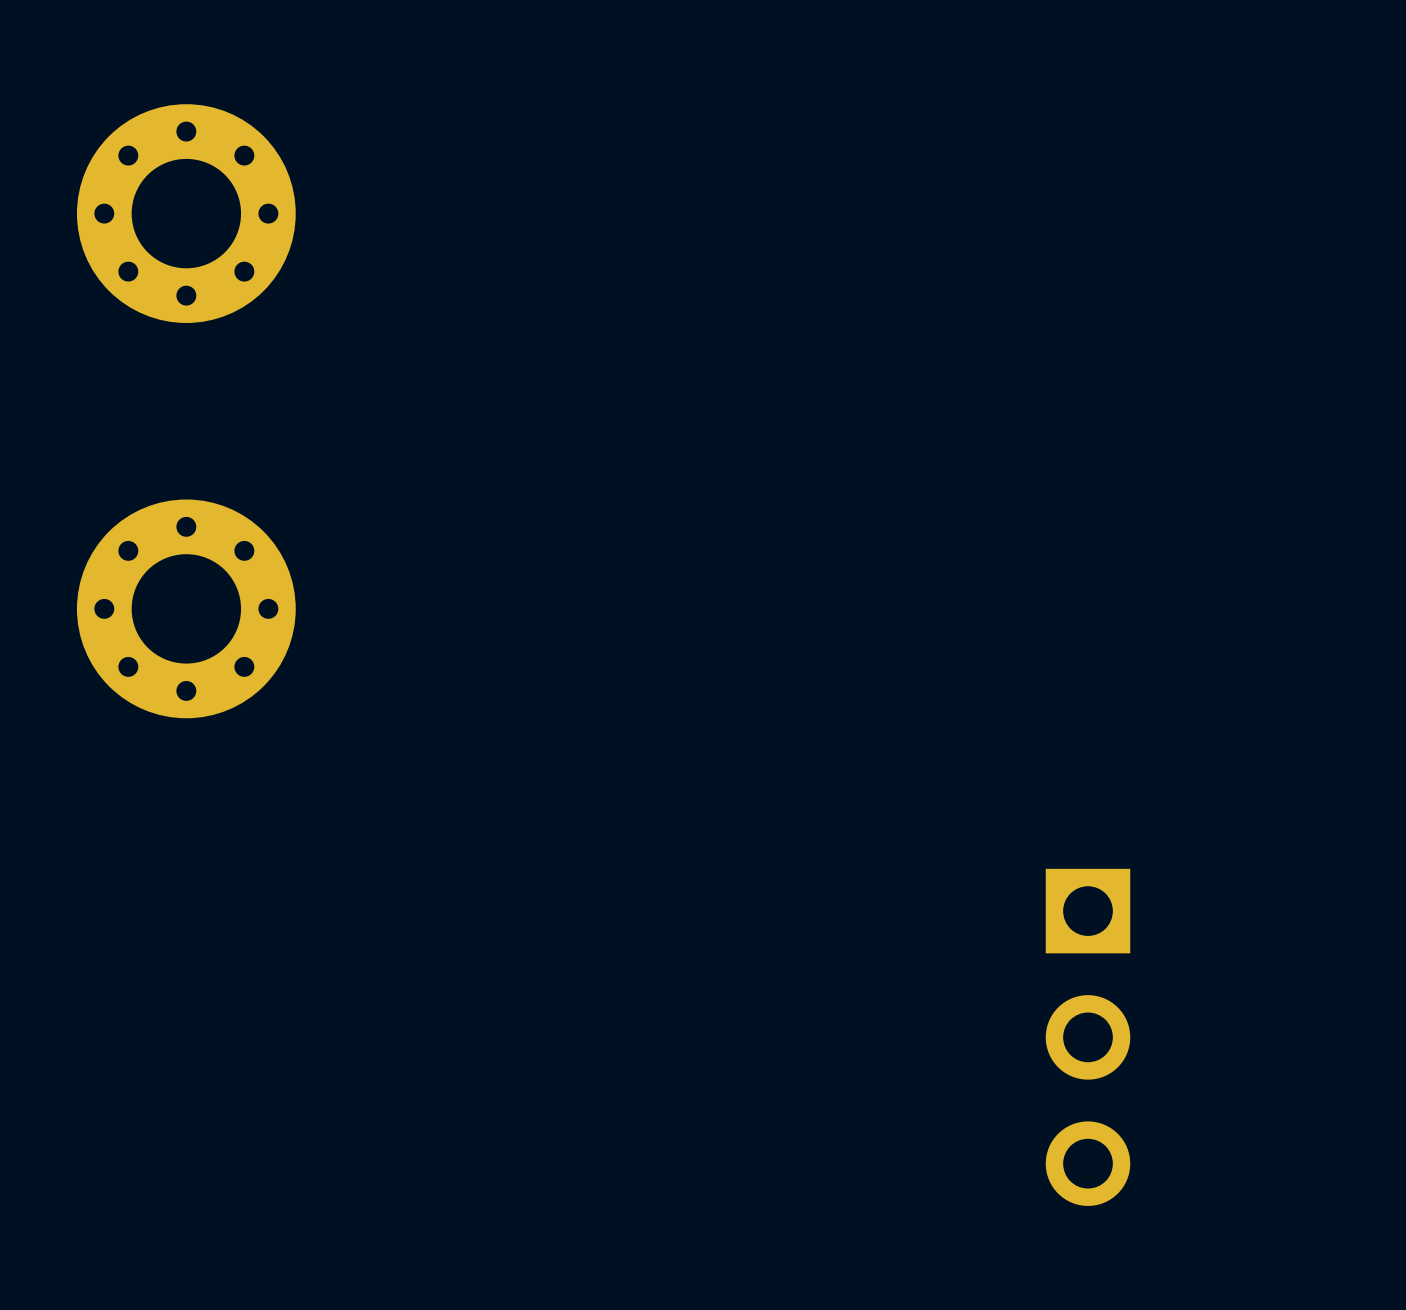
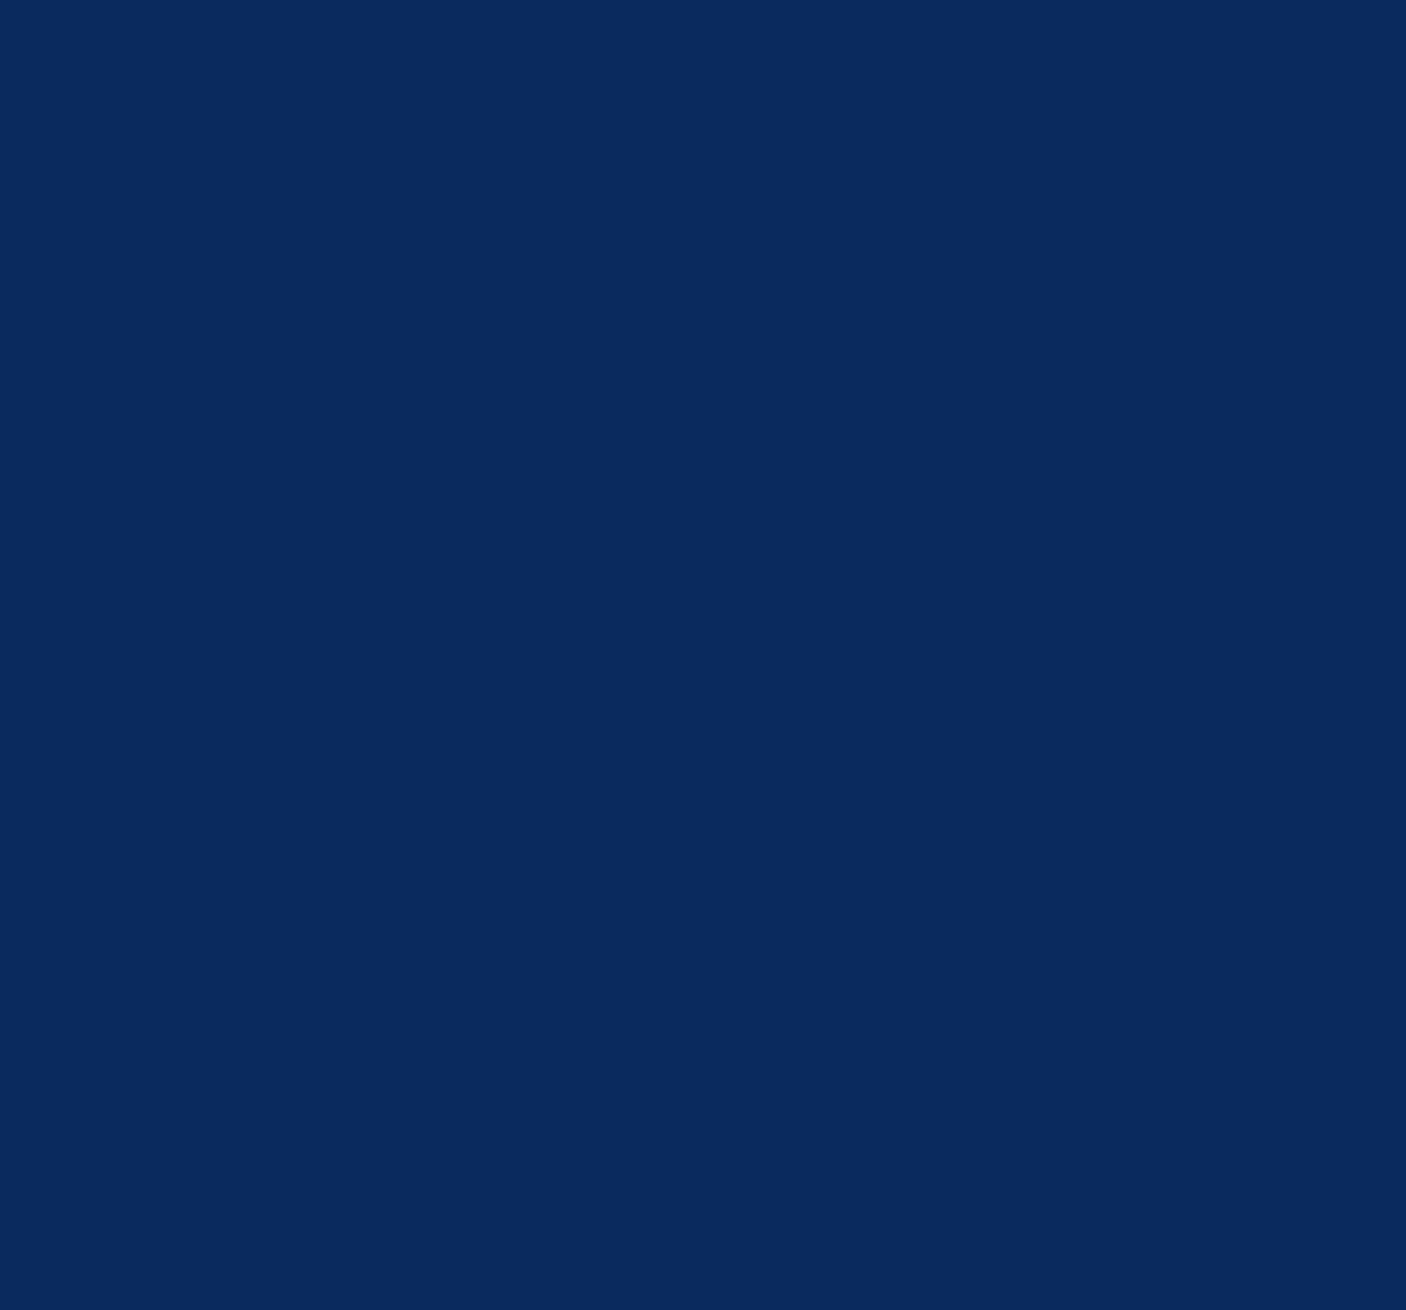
part: (186, 213) -> none
part: (186, 608) -> none
part: (1087, 1037) -> none

